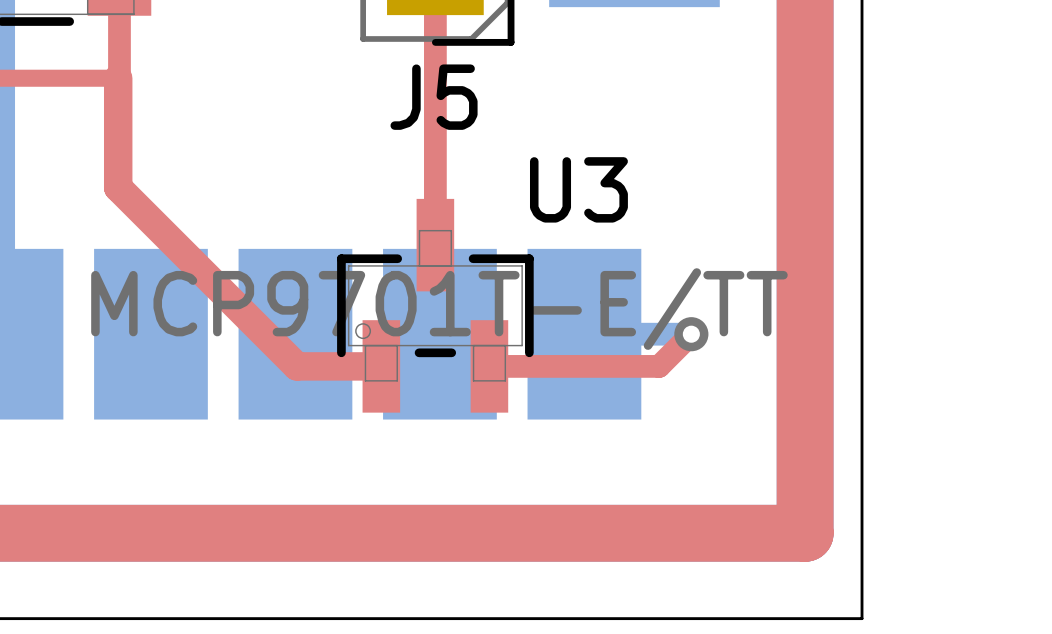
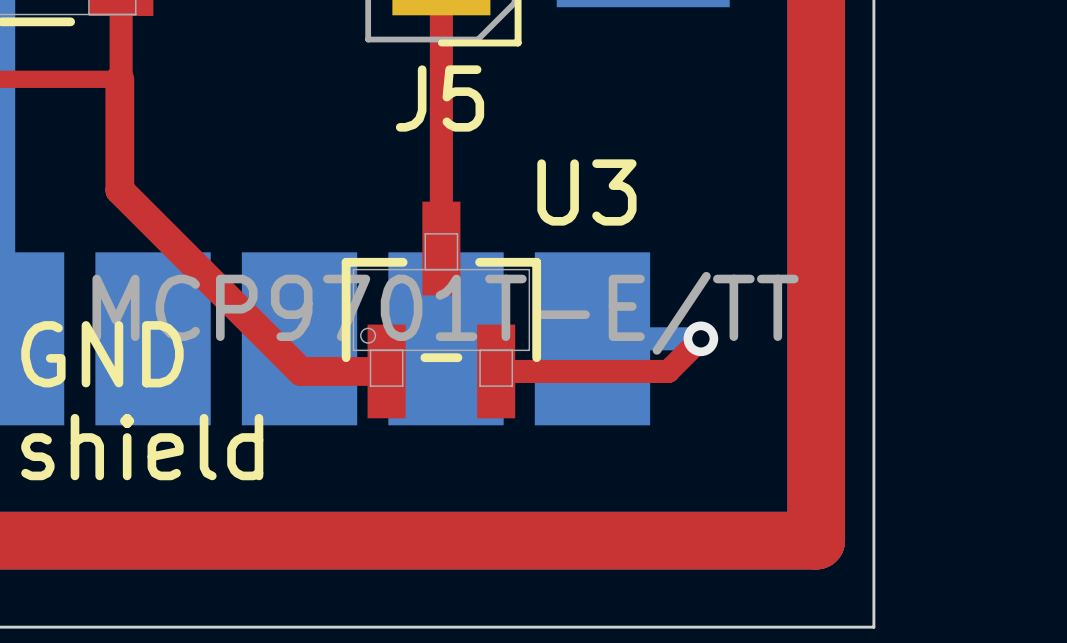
text: none -> GND (102, 354)
text: none -> shield (142, 447)

